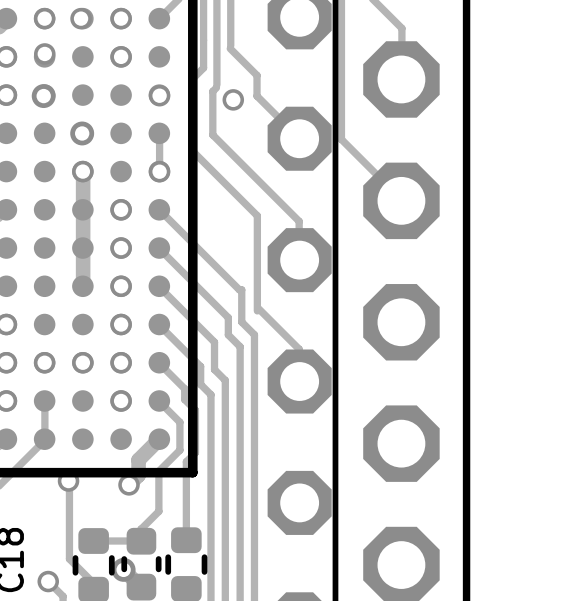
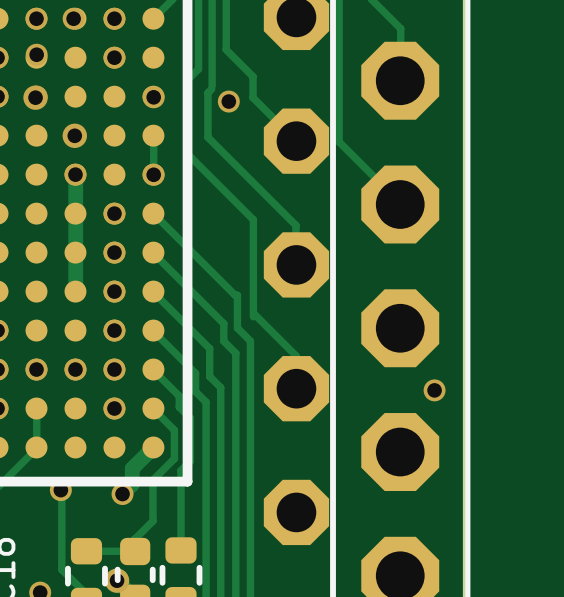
via: none -> (434, 390)

